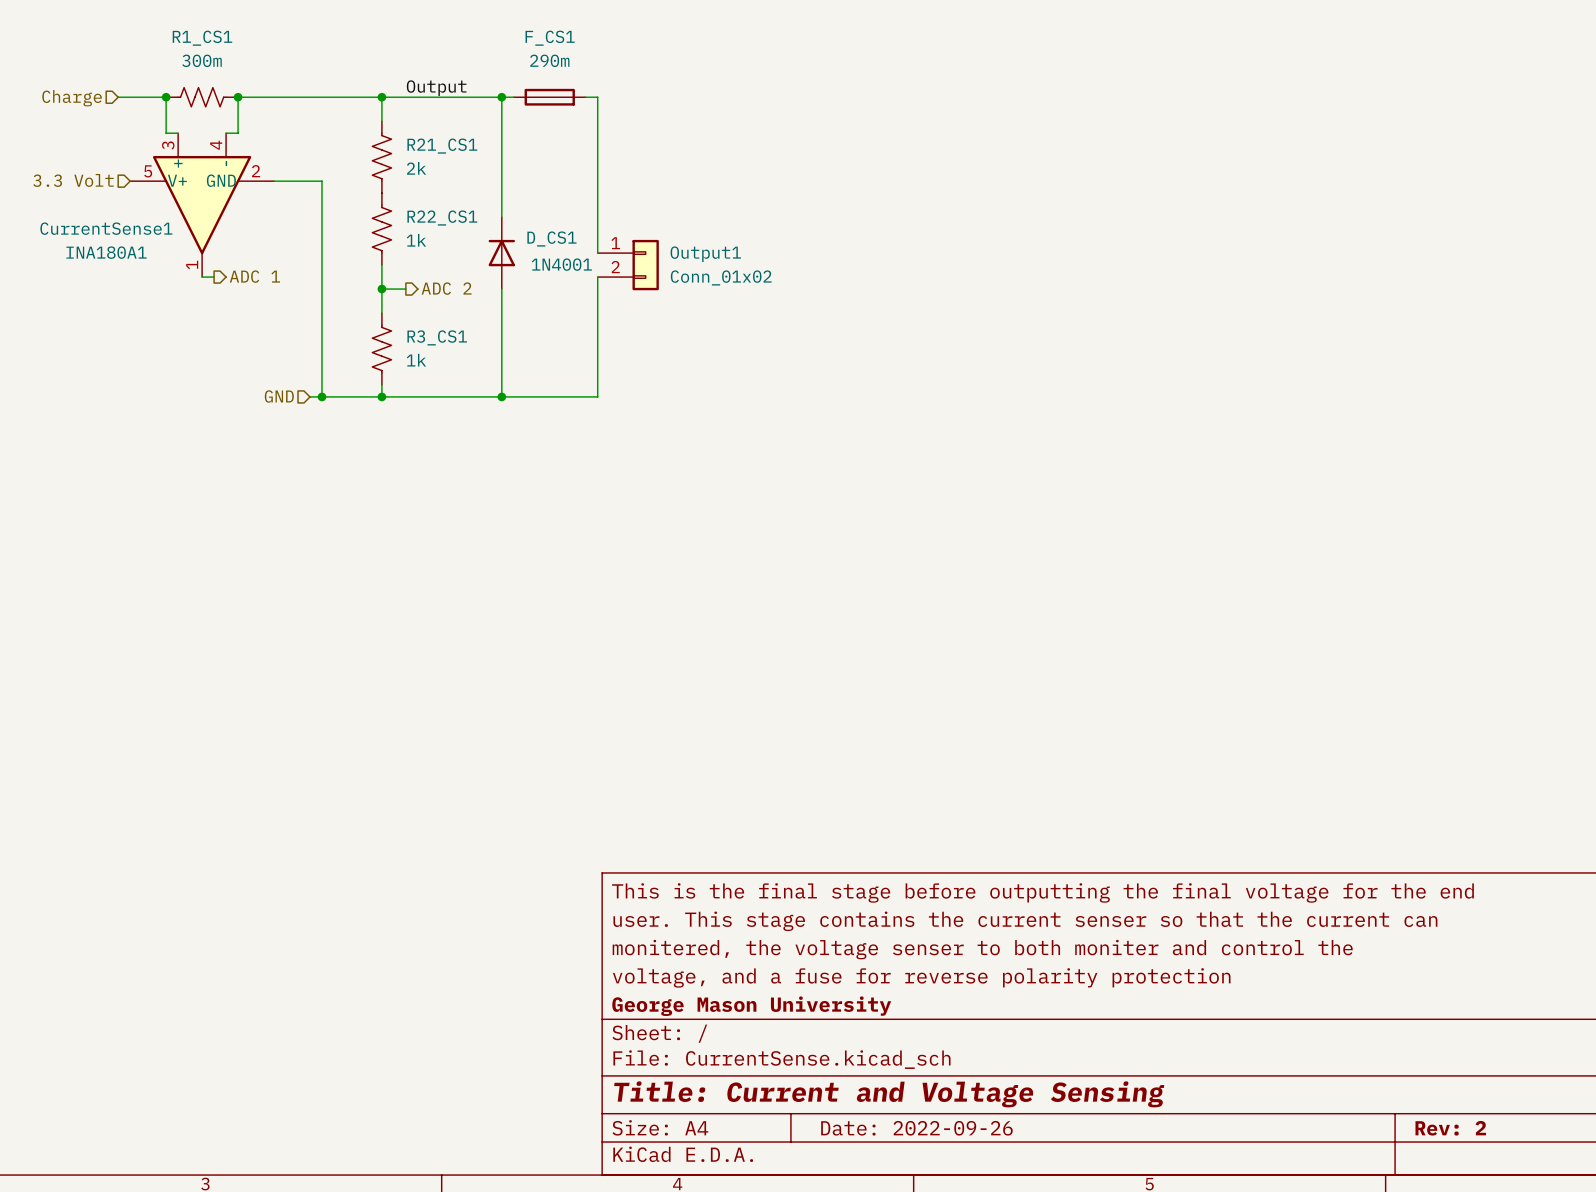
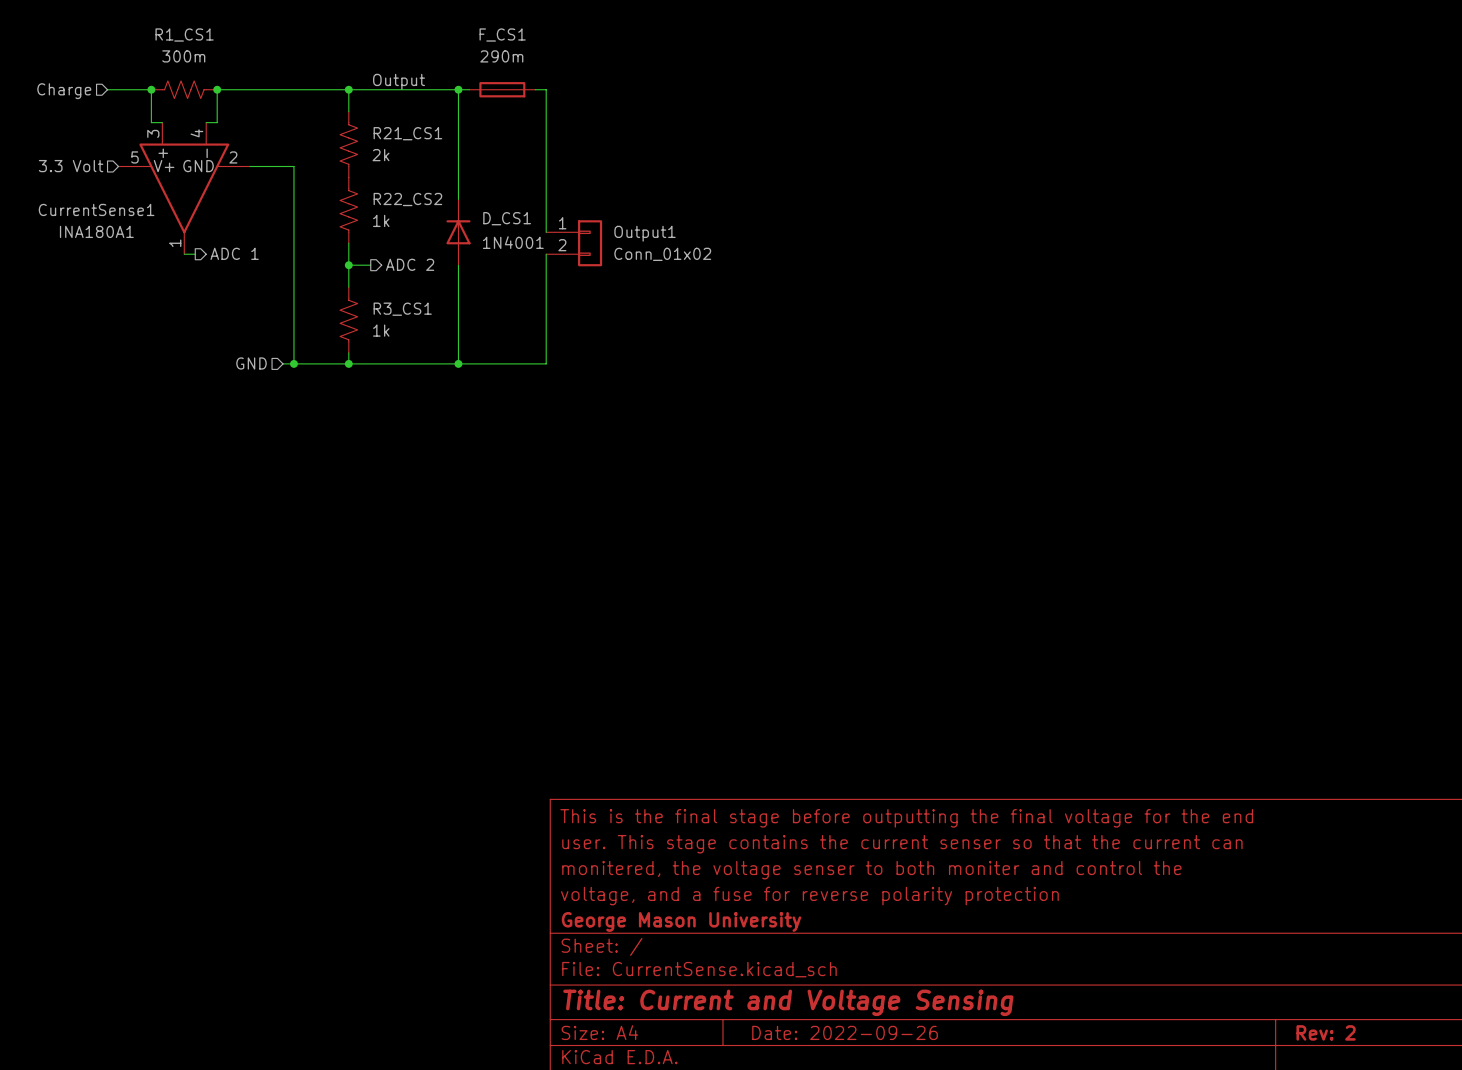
R22_CS1 name: R22_CS1 (442, 218) -> R22_CS2 (407, 199)

